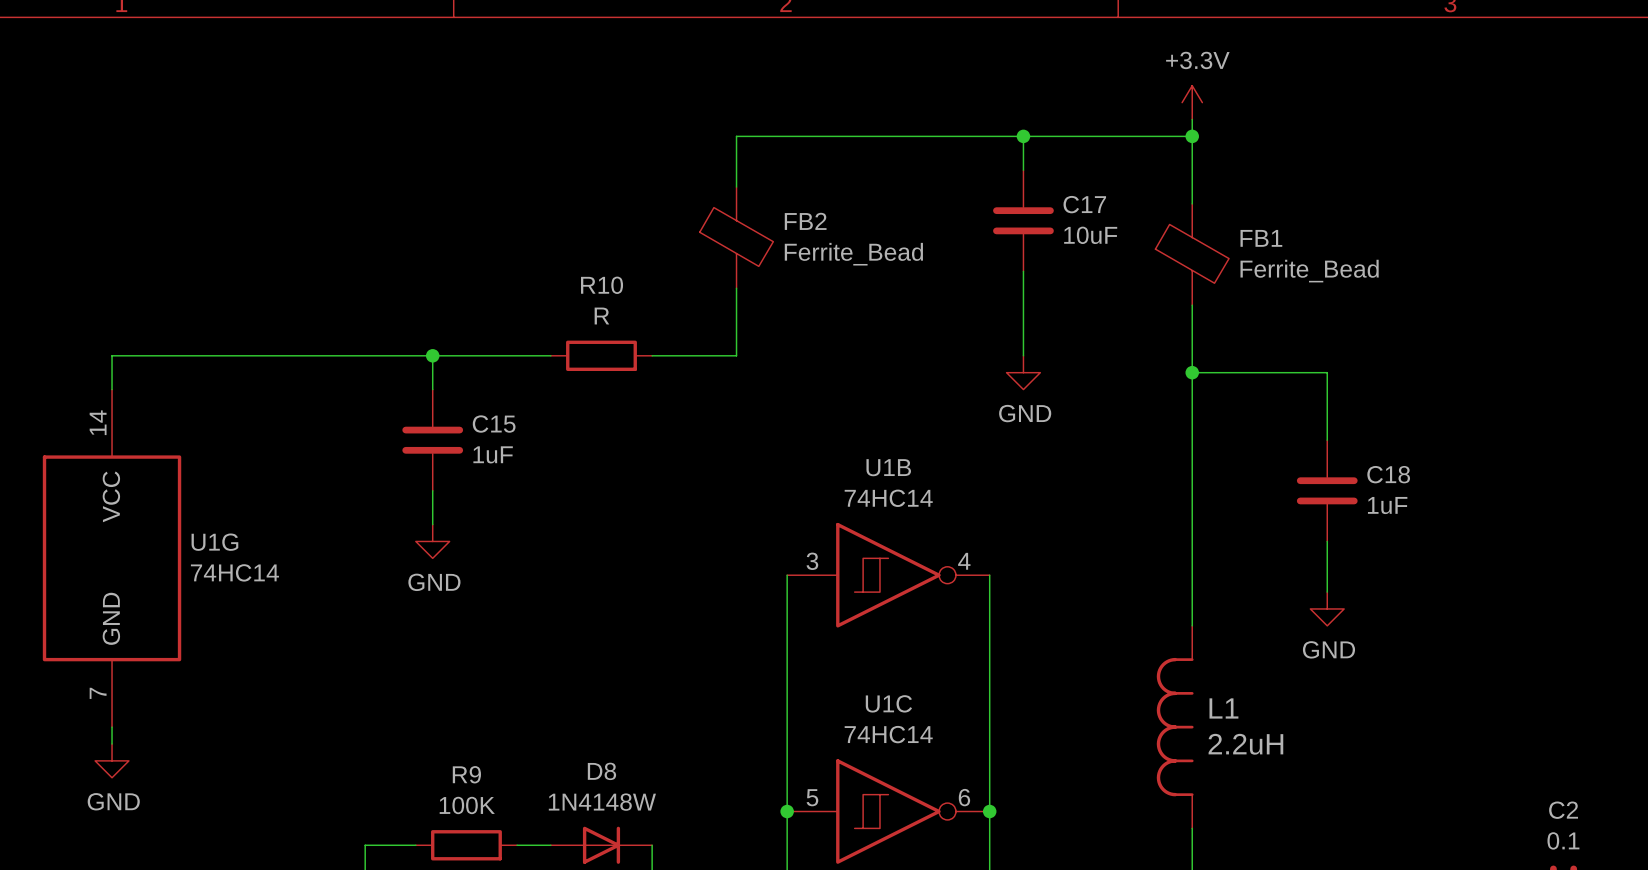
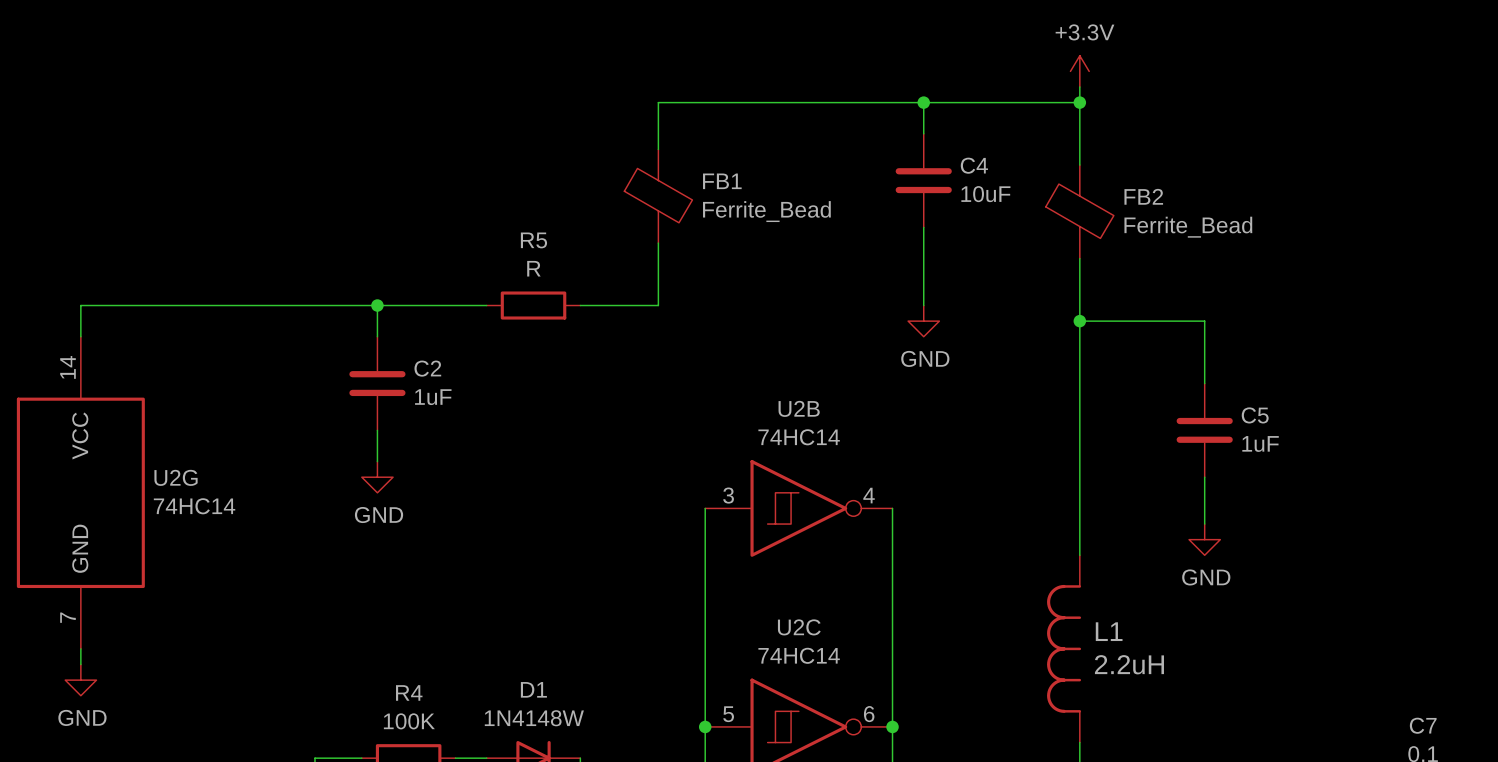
C17 name: C17 (1084, 204) -> C4 (974, 165)
FB2 name: FB2 (805, 221) -> FB1 (722, 181)
FB1 name: FB1 (1261, 238) -> FB2 (1143, 196)
R10 name: R10 (602, 285) -> R5 (533, 240)
C15 name: C15 (494, 424) -> C2 (427, 368)
U1B name: U1B (888, 467) -> U2B (799, 408)
C18 name: C18 (1388, 474) -> C5 (1255, 415)
U1G name: U1G (214, 542) -> U2G (176, 477)
U1C name: U1C (888, 703) -> U2C (799, 627)
D8 name: D8 (601, 771) -> D1 (533, 689)
R9 name: R9 (466, 774) -> R4 (409, 692)
C2 name: C2 (1563, 810) -> C7 (1423, 725)

